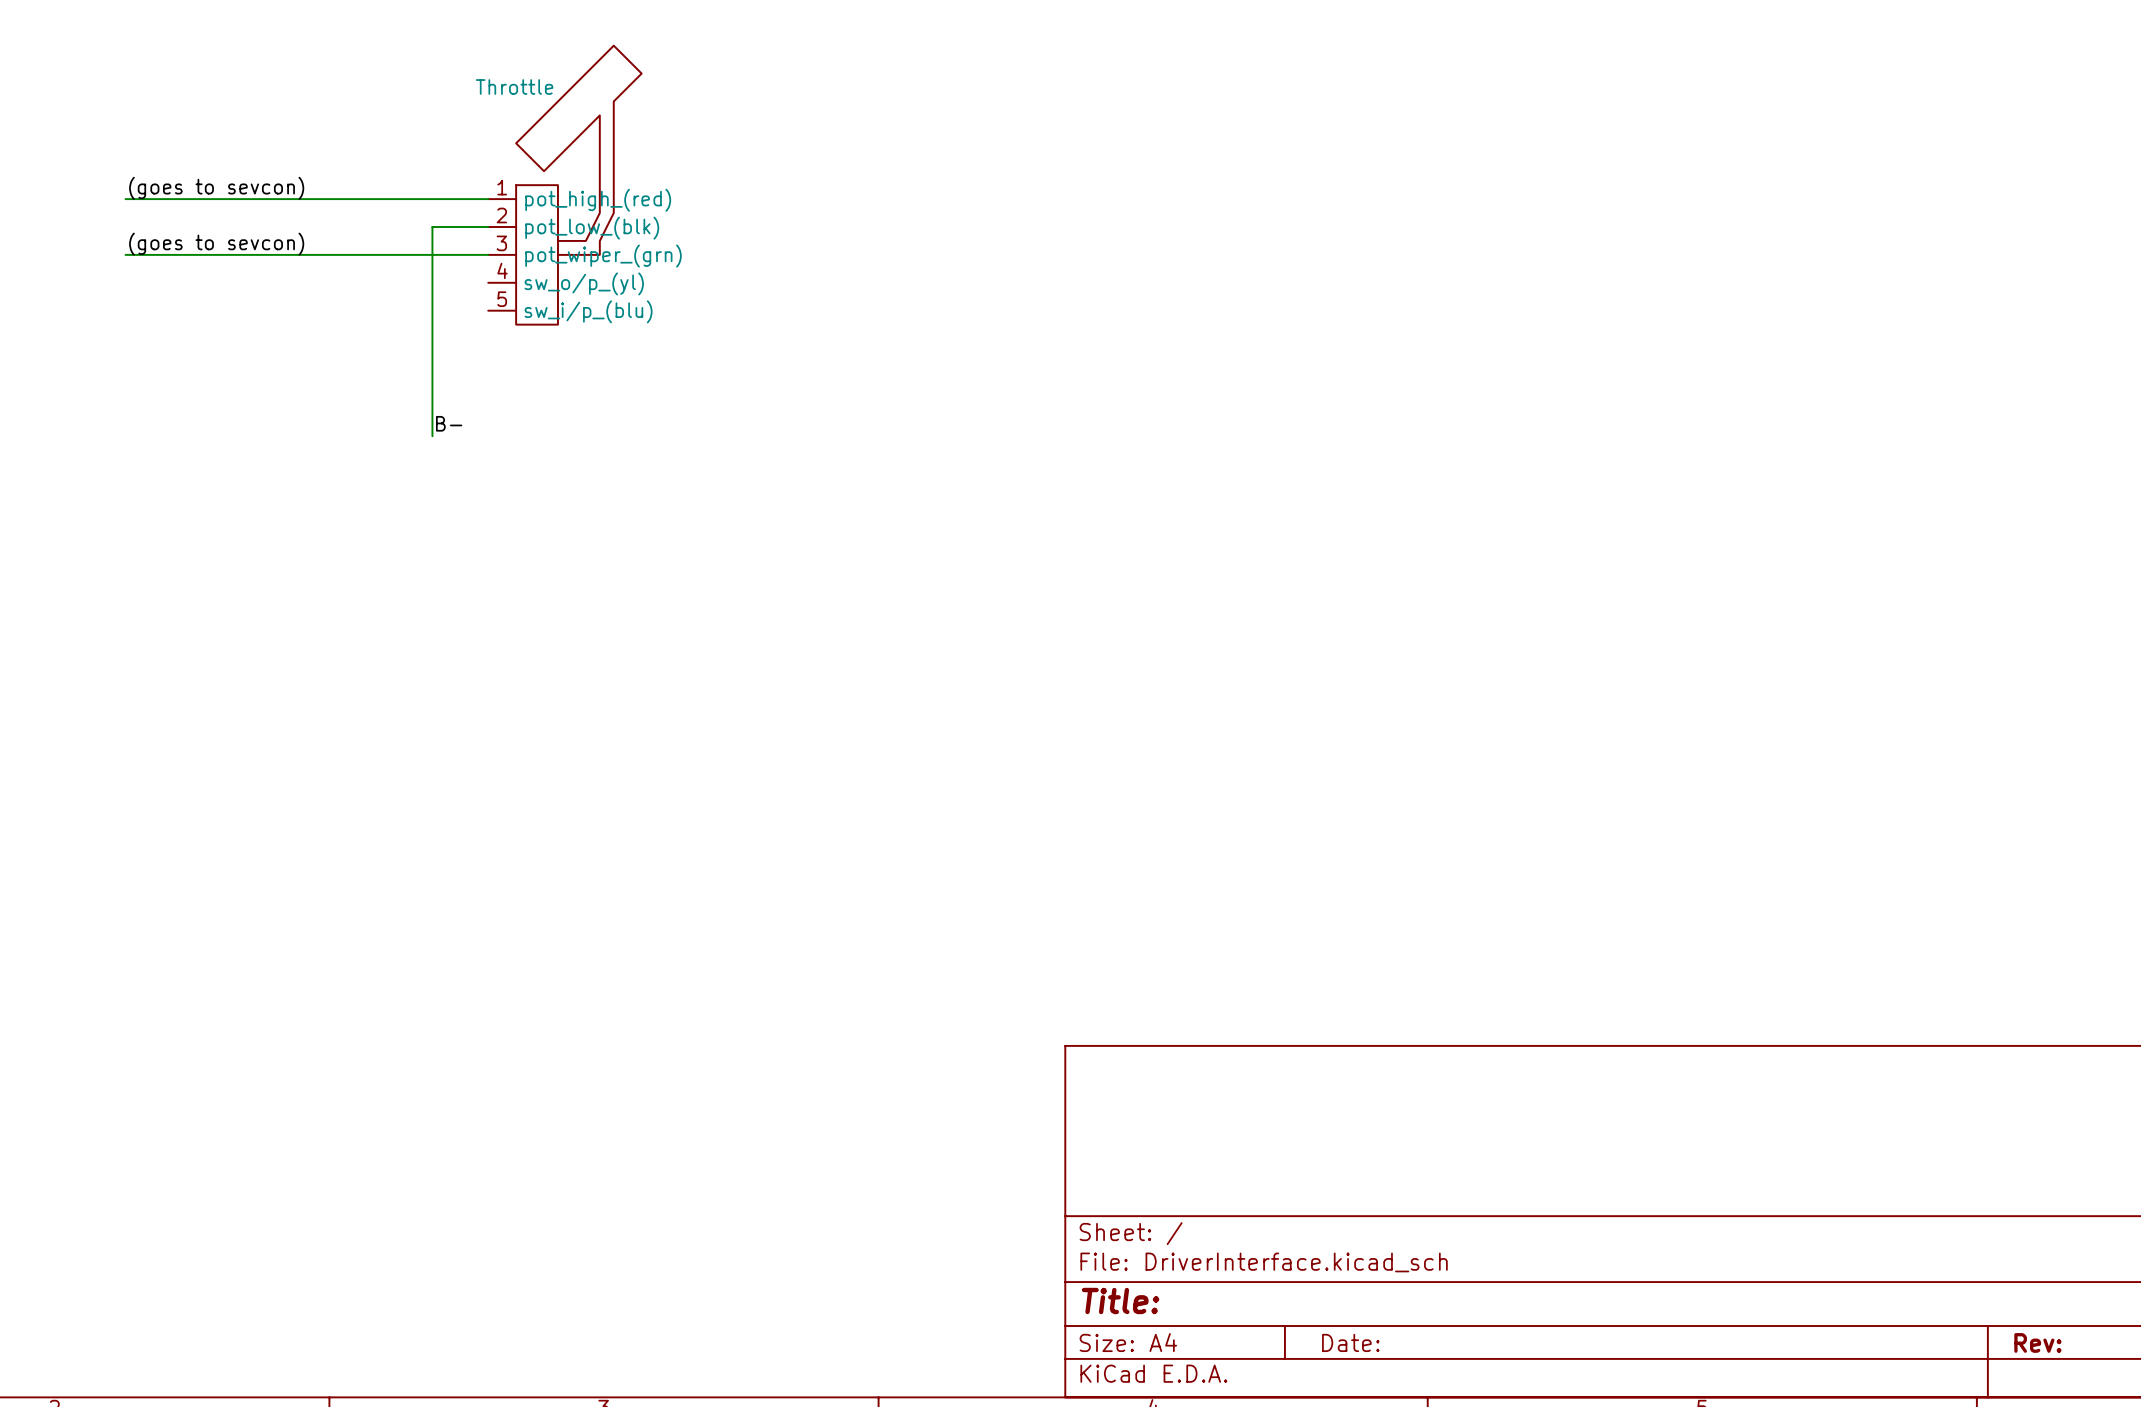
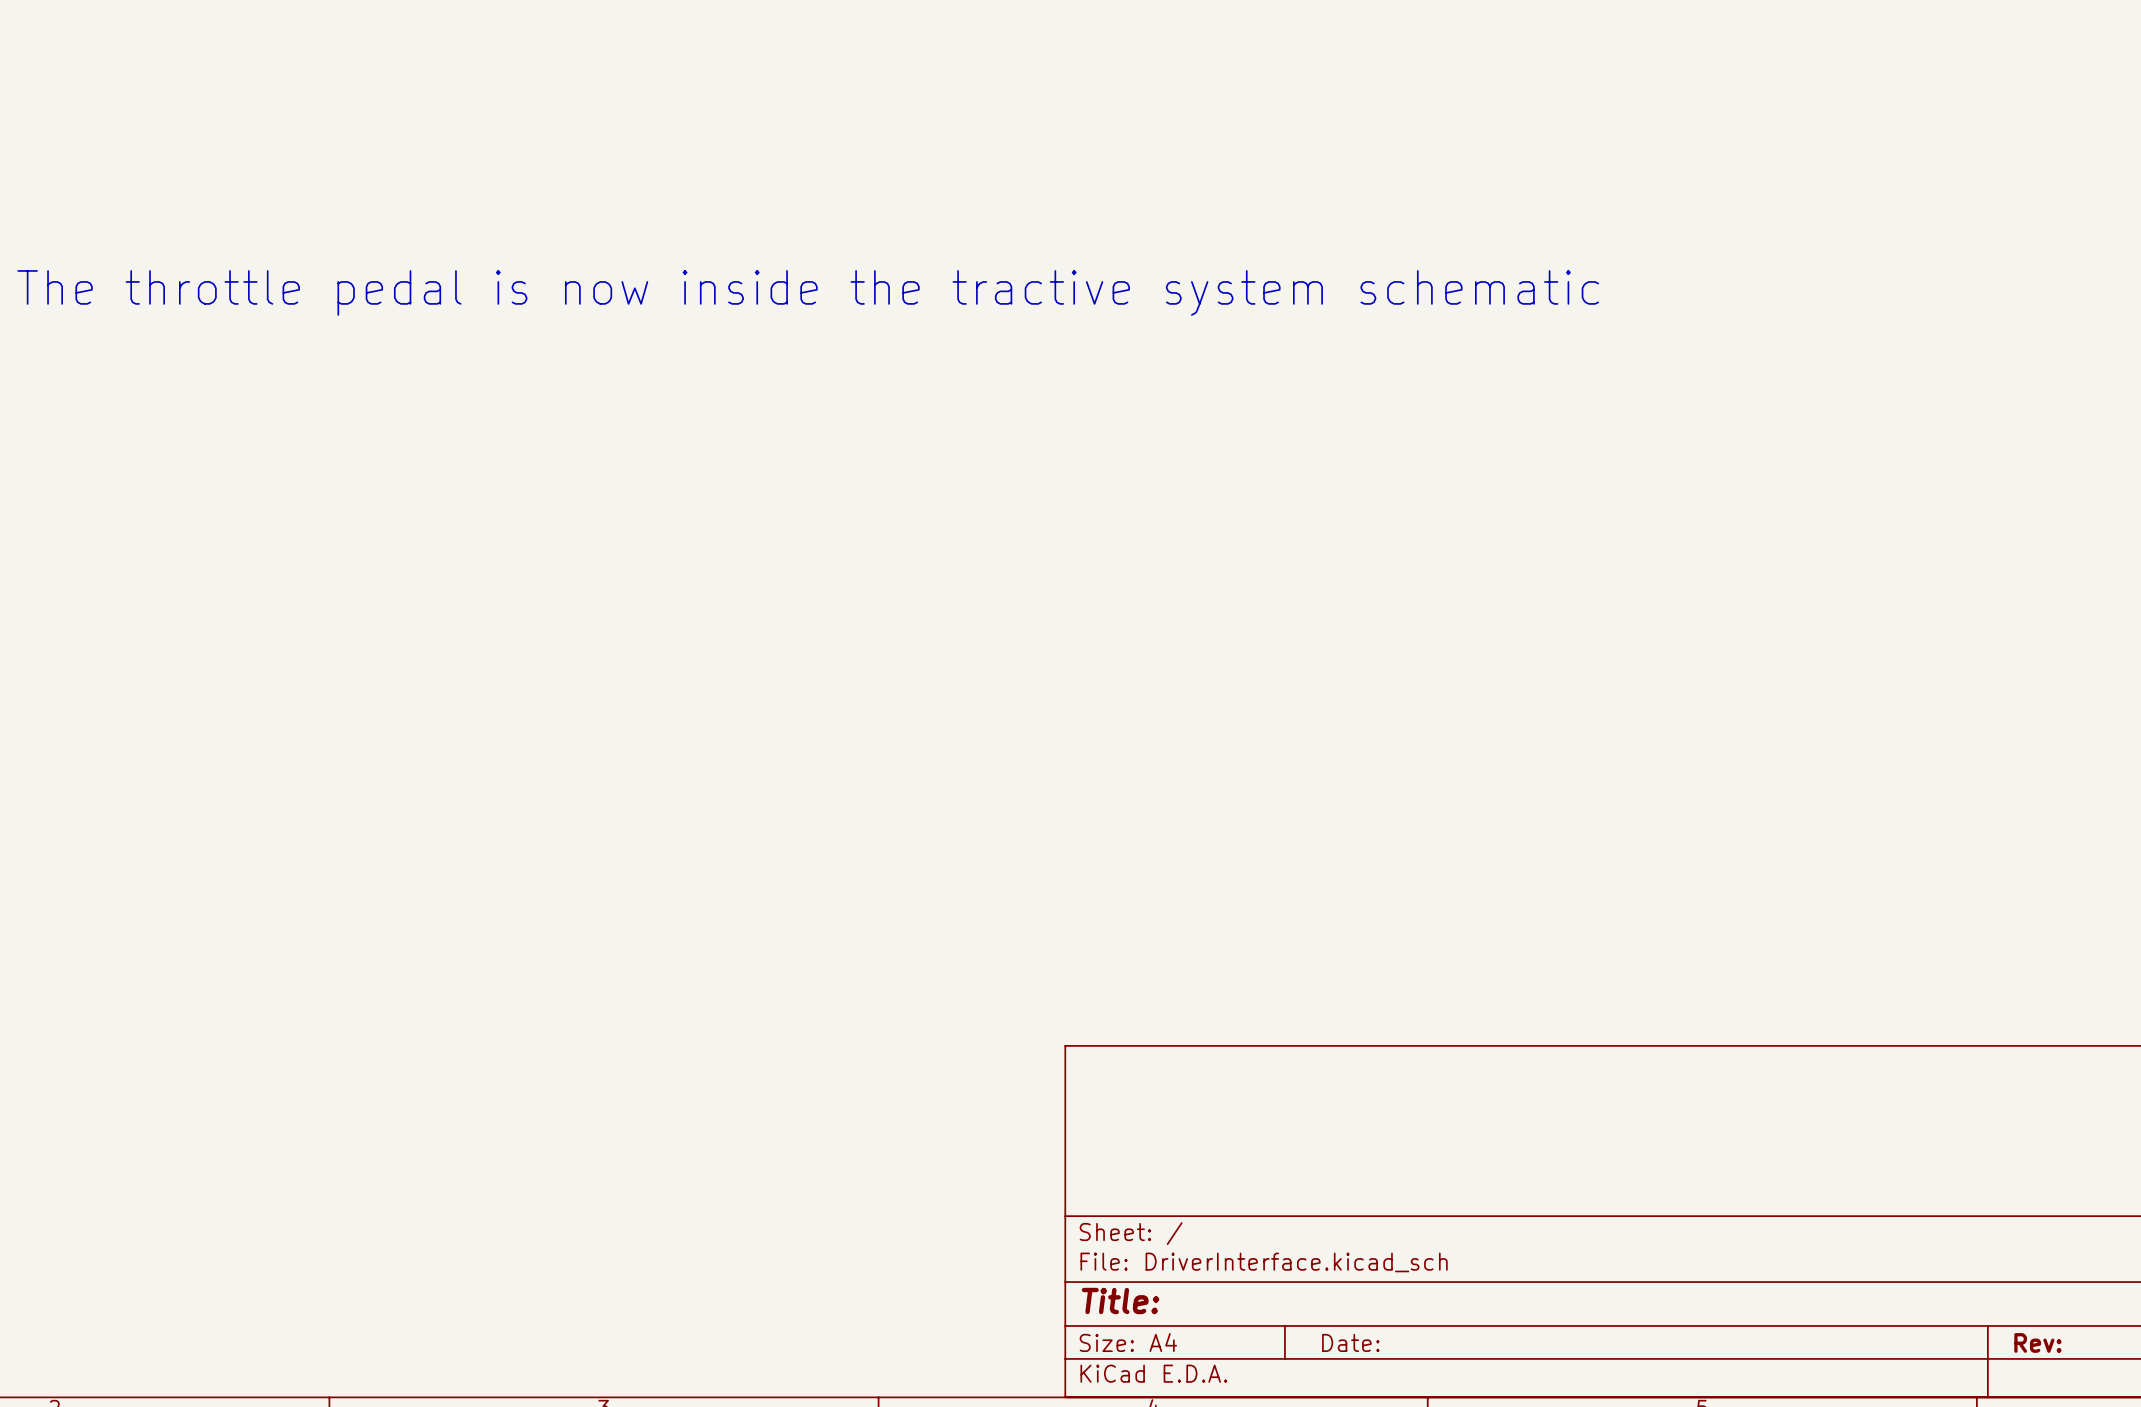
part: Throttle (564, 185) -> none
label: (goes to sevcon) (216, 188) -> none
wire: (125, 199) (488, 199) -> none
wire: (488, 227) (432, 227) (432, 436) -> none
label: (goes to sevcon) (216, 244) -> none
wire: (125, 254) (488, 254) -> none
text: none -> The throttle pedal is now inside the tractive system schematic (808, 292)
label: B- (449, 423) -> none

